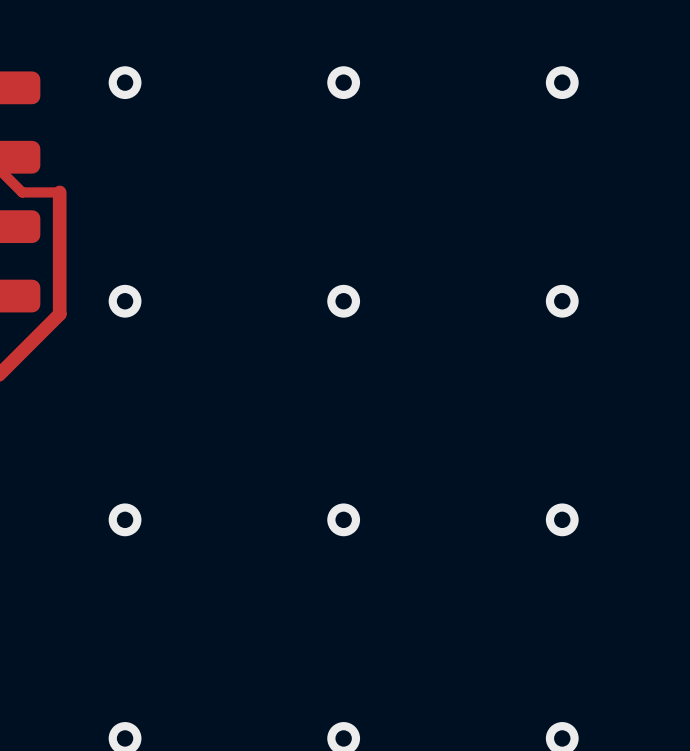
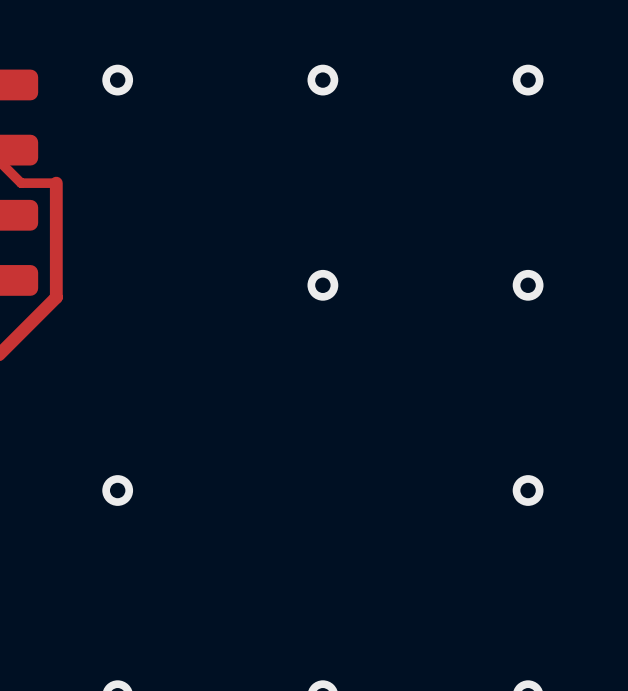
via: (125, 301) -> none
via: (343, 519) -> none

